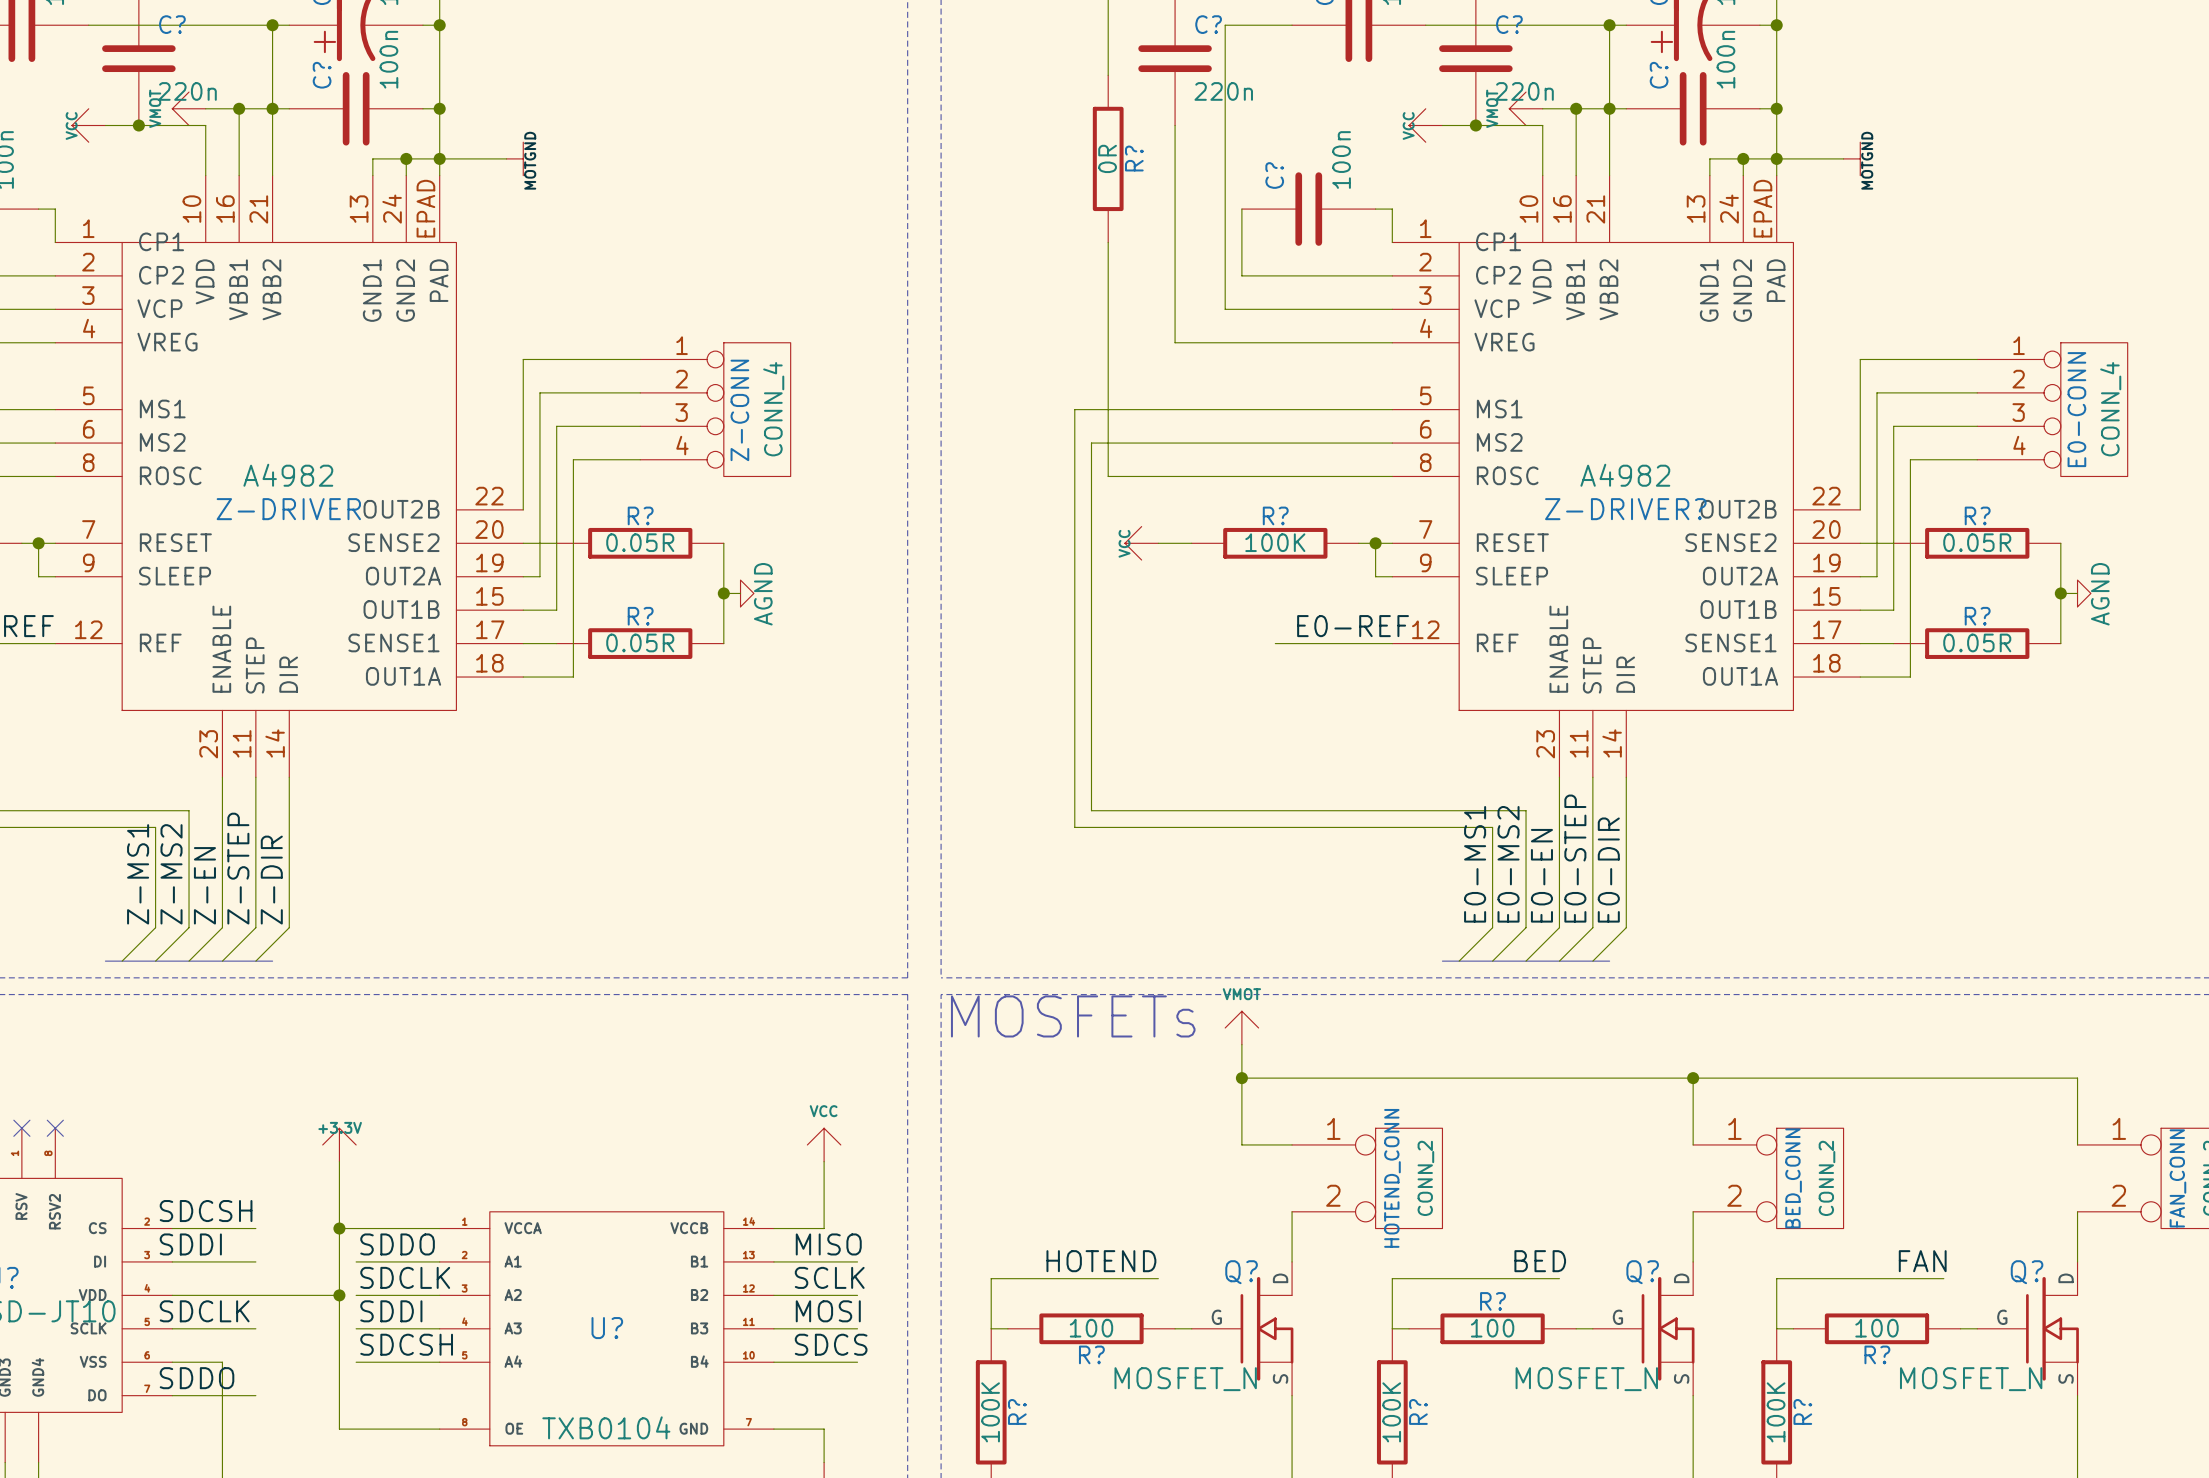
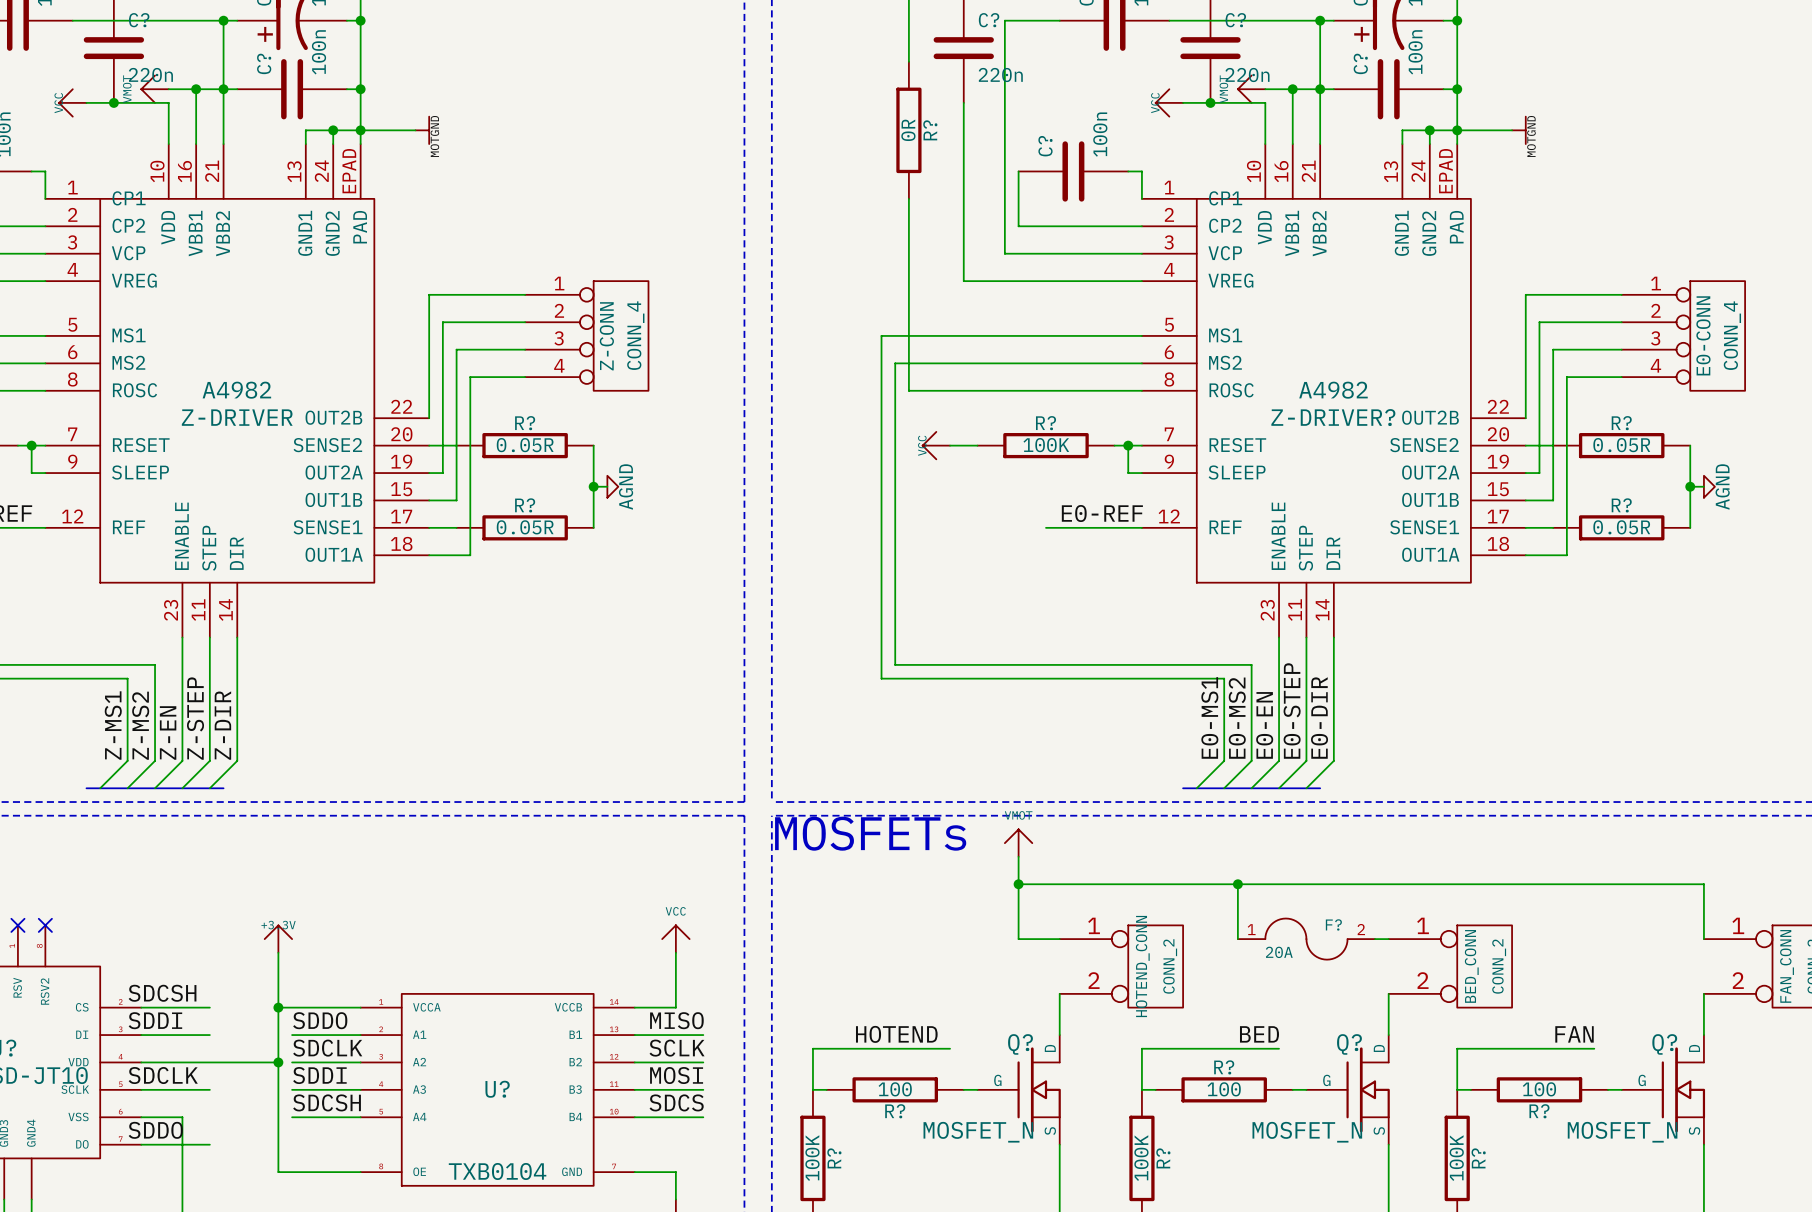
wire: none -> (1237, 884) (1237, 939)
junction: none -> (1237, 884)
wire: (1693, 1078) (1693, 1144) -> (1374, 939) (1388, 939)
junction: (1693, 1078) -> none
F?: none -> 20A (1306, 939)

